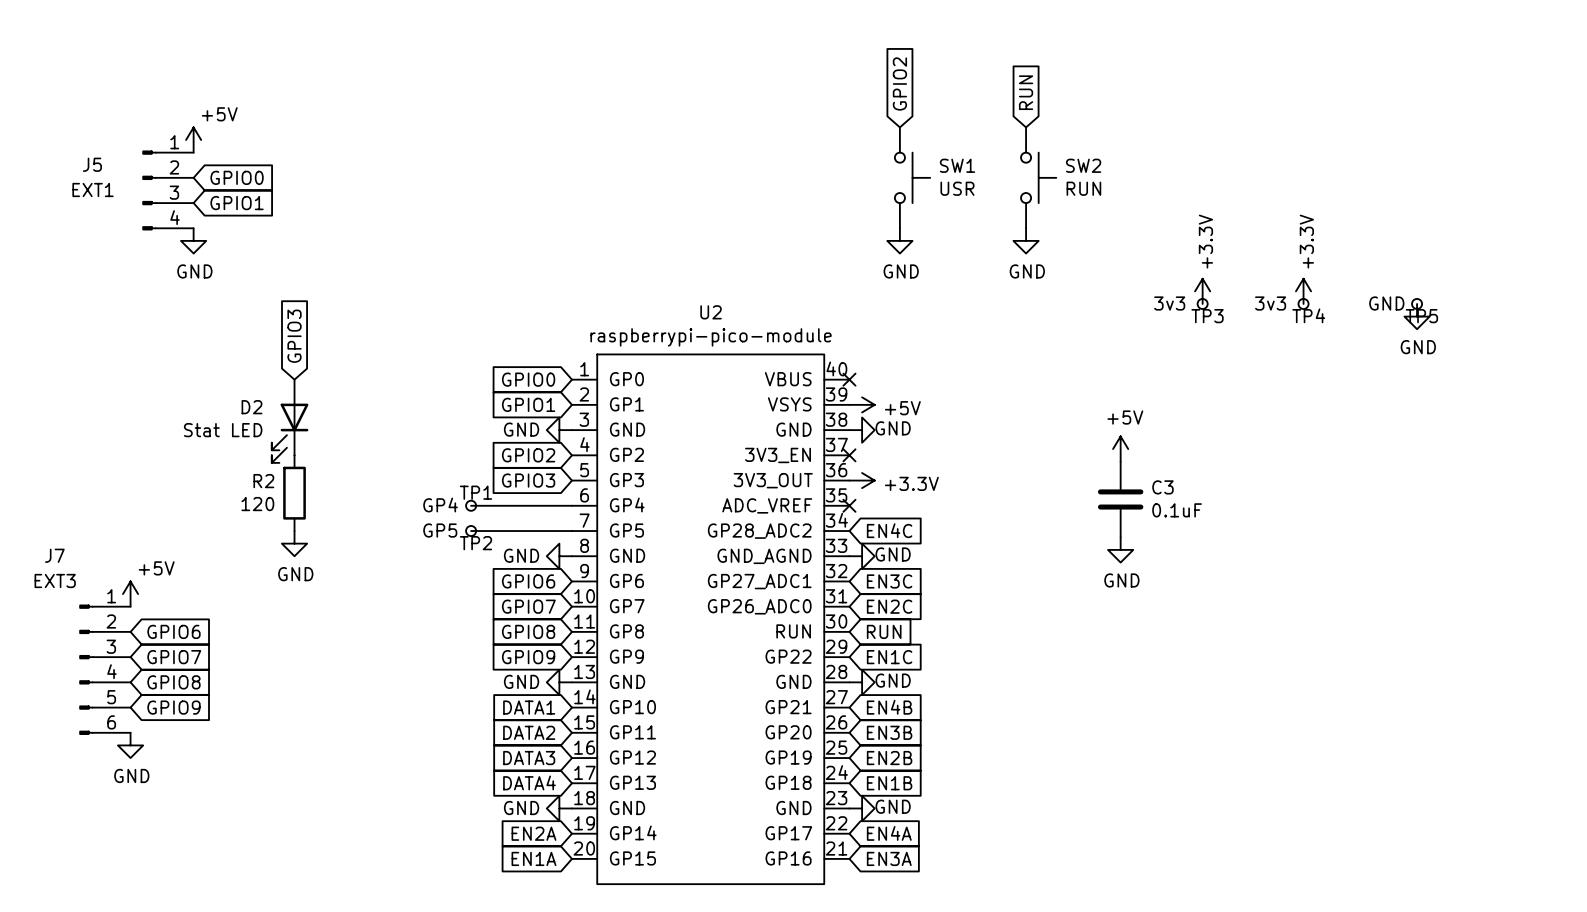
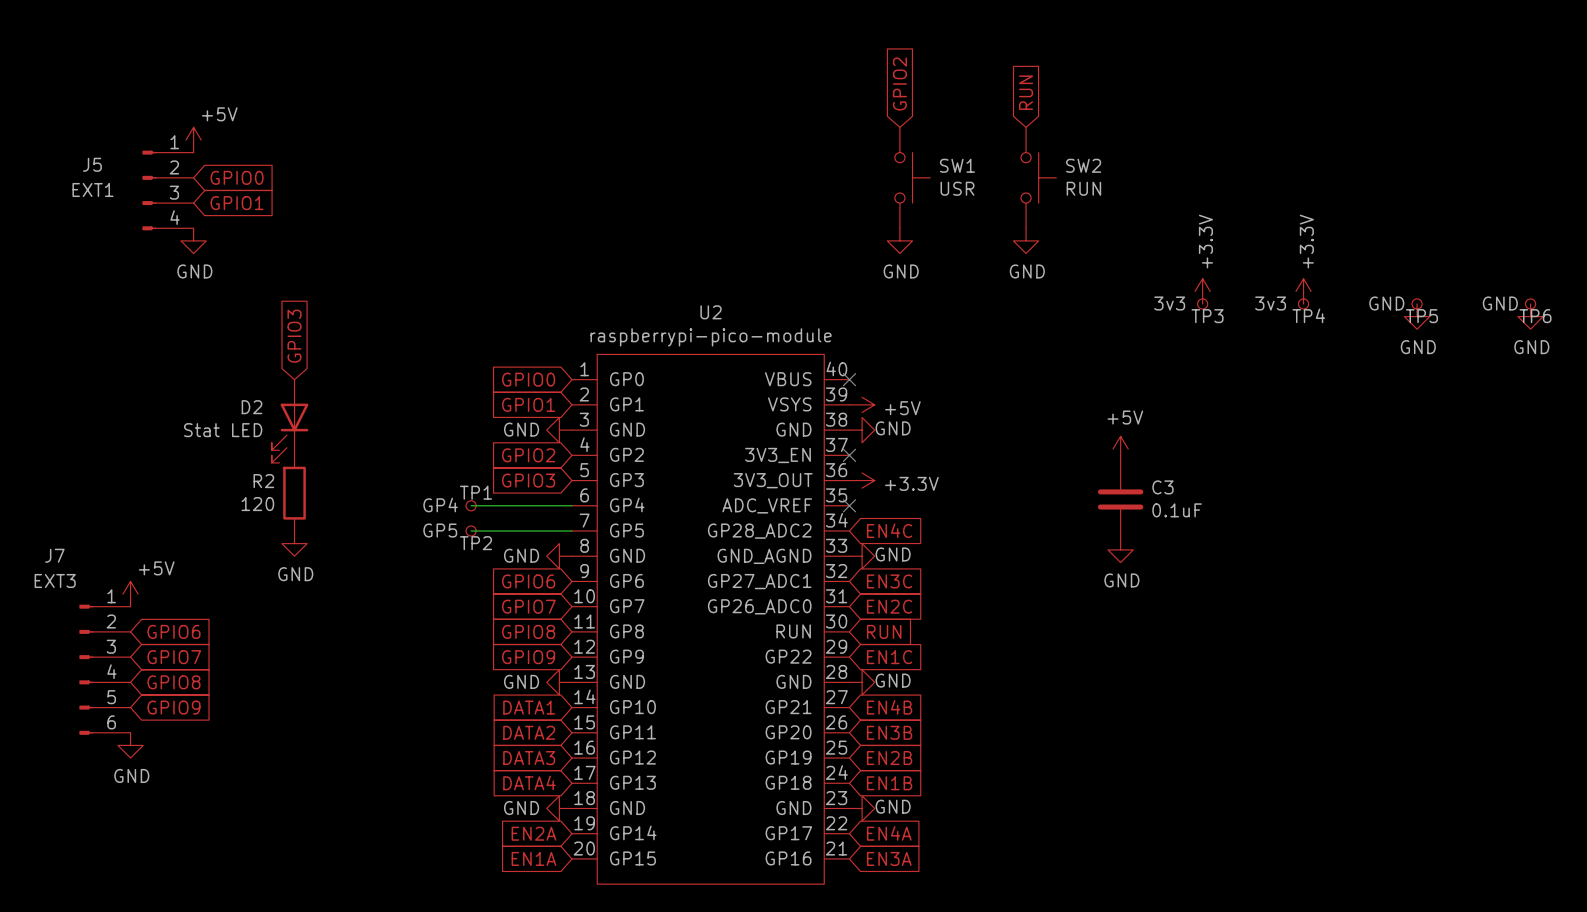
TP6: none -> GND (1530, 303)
power symbol: none -> GND (1530, 316)

